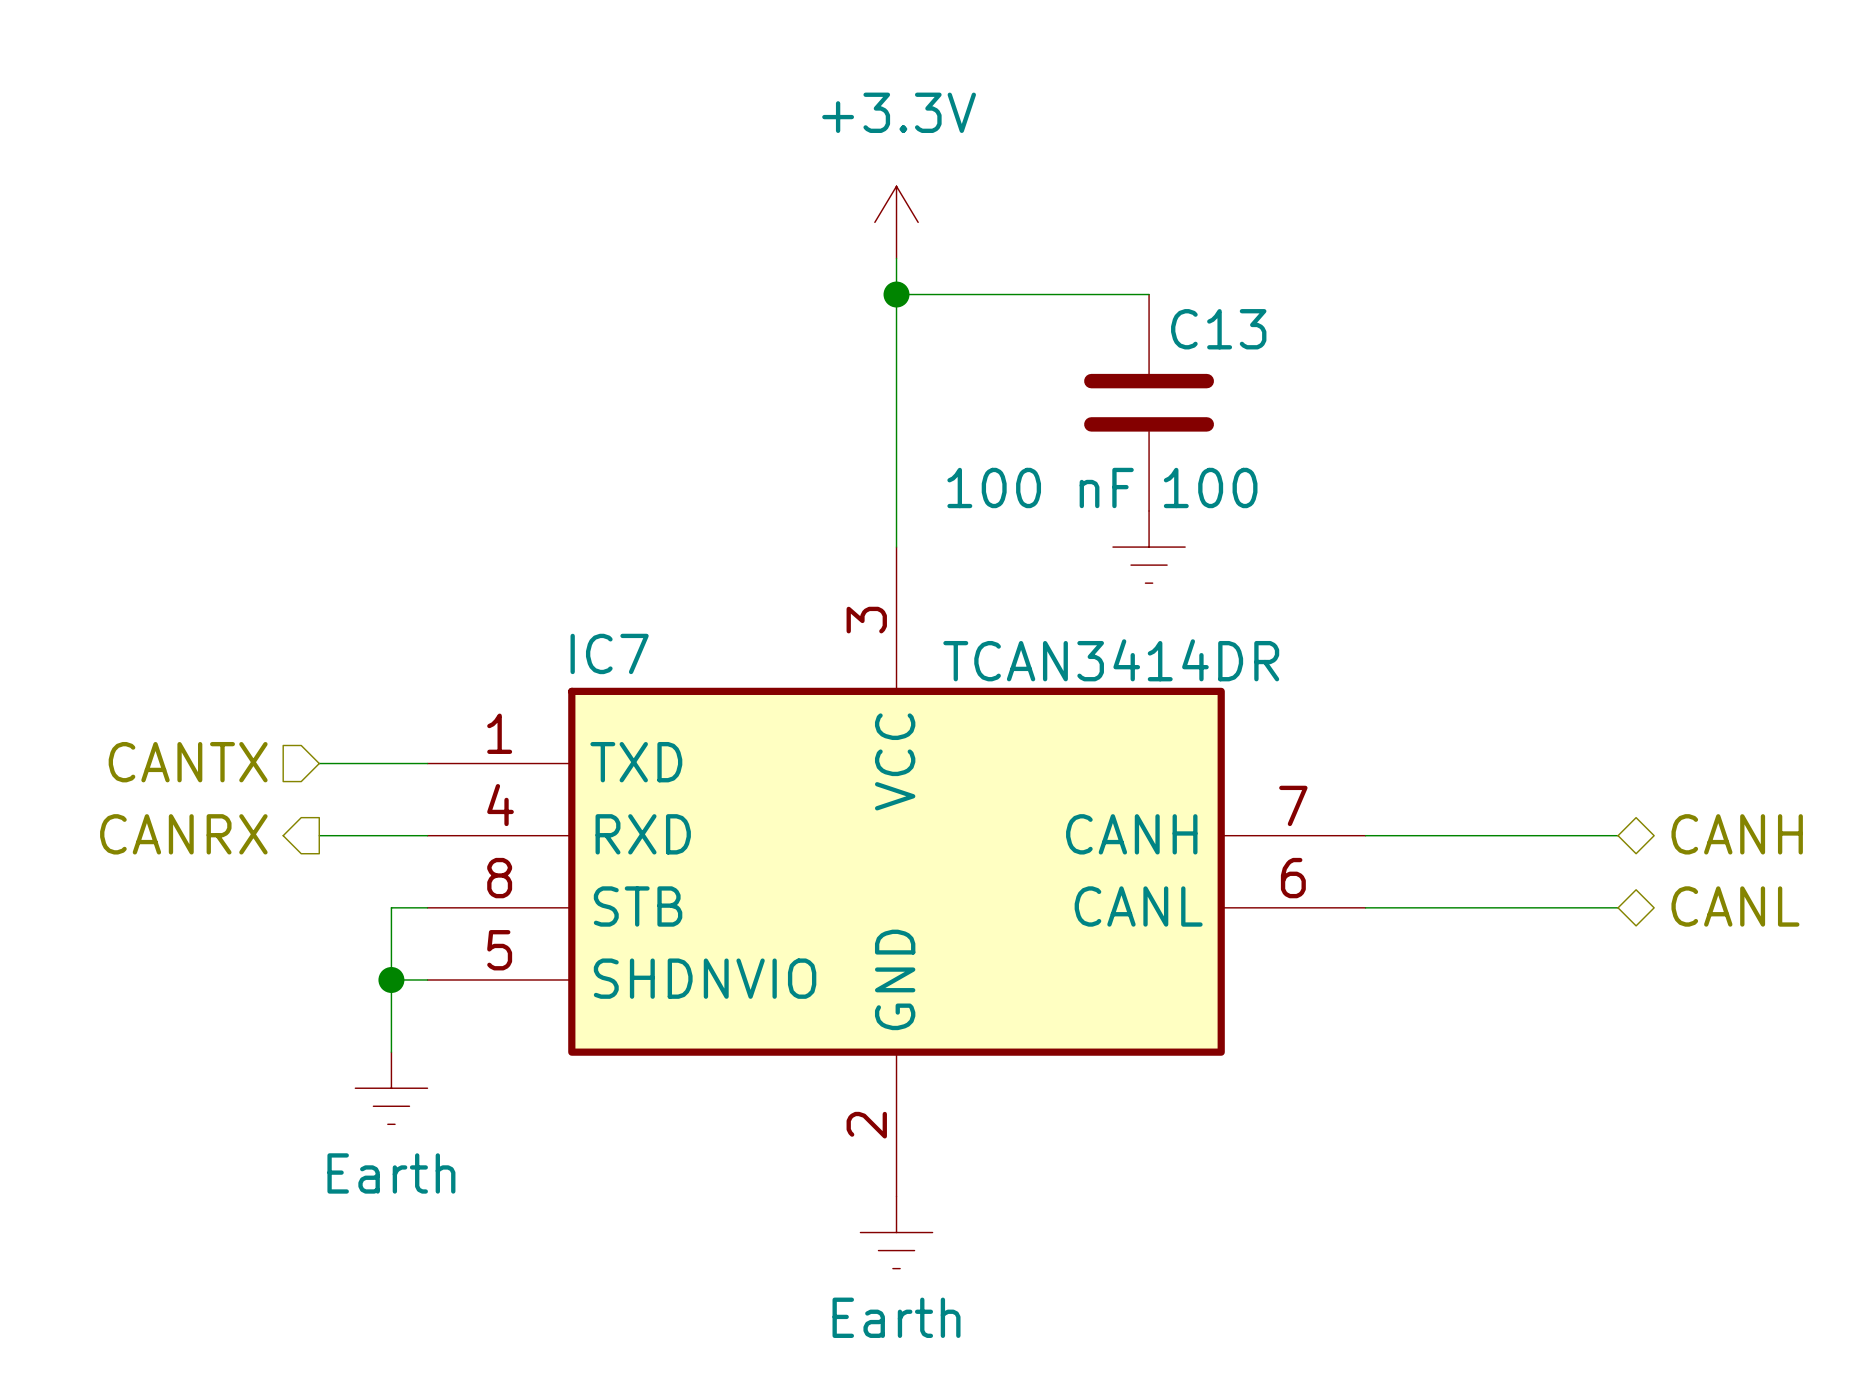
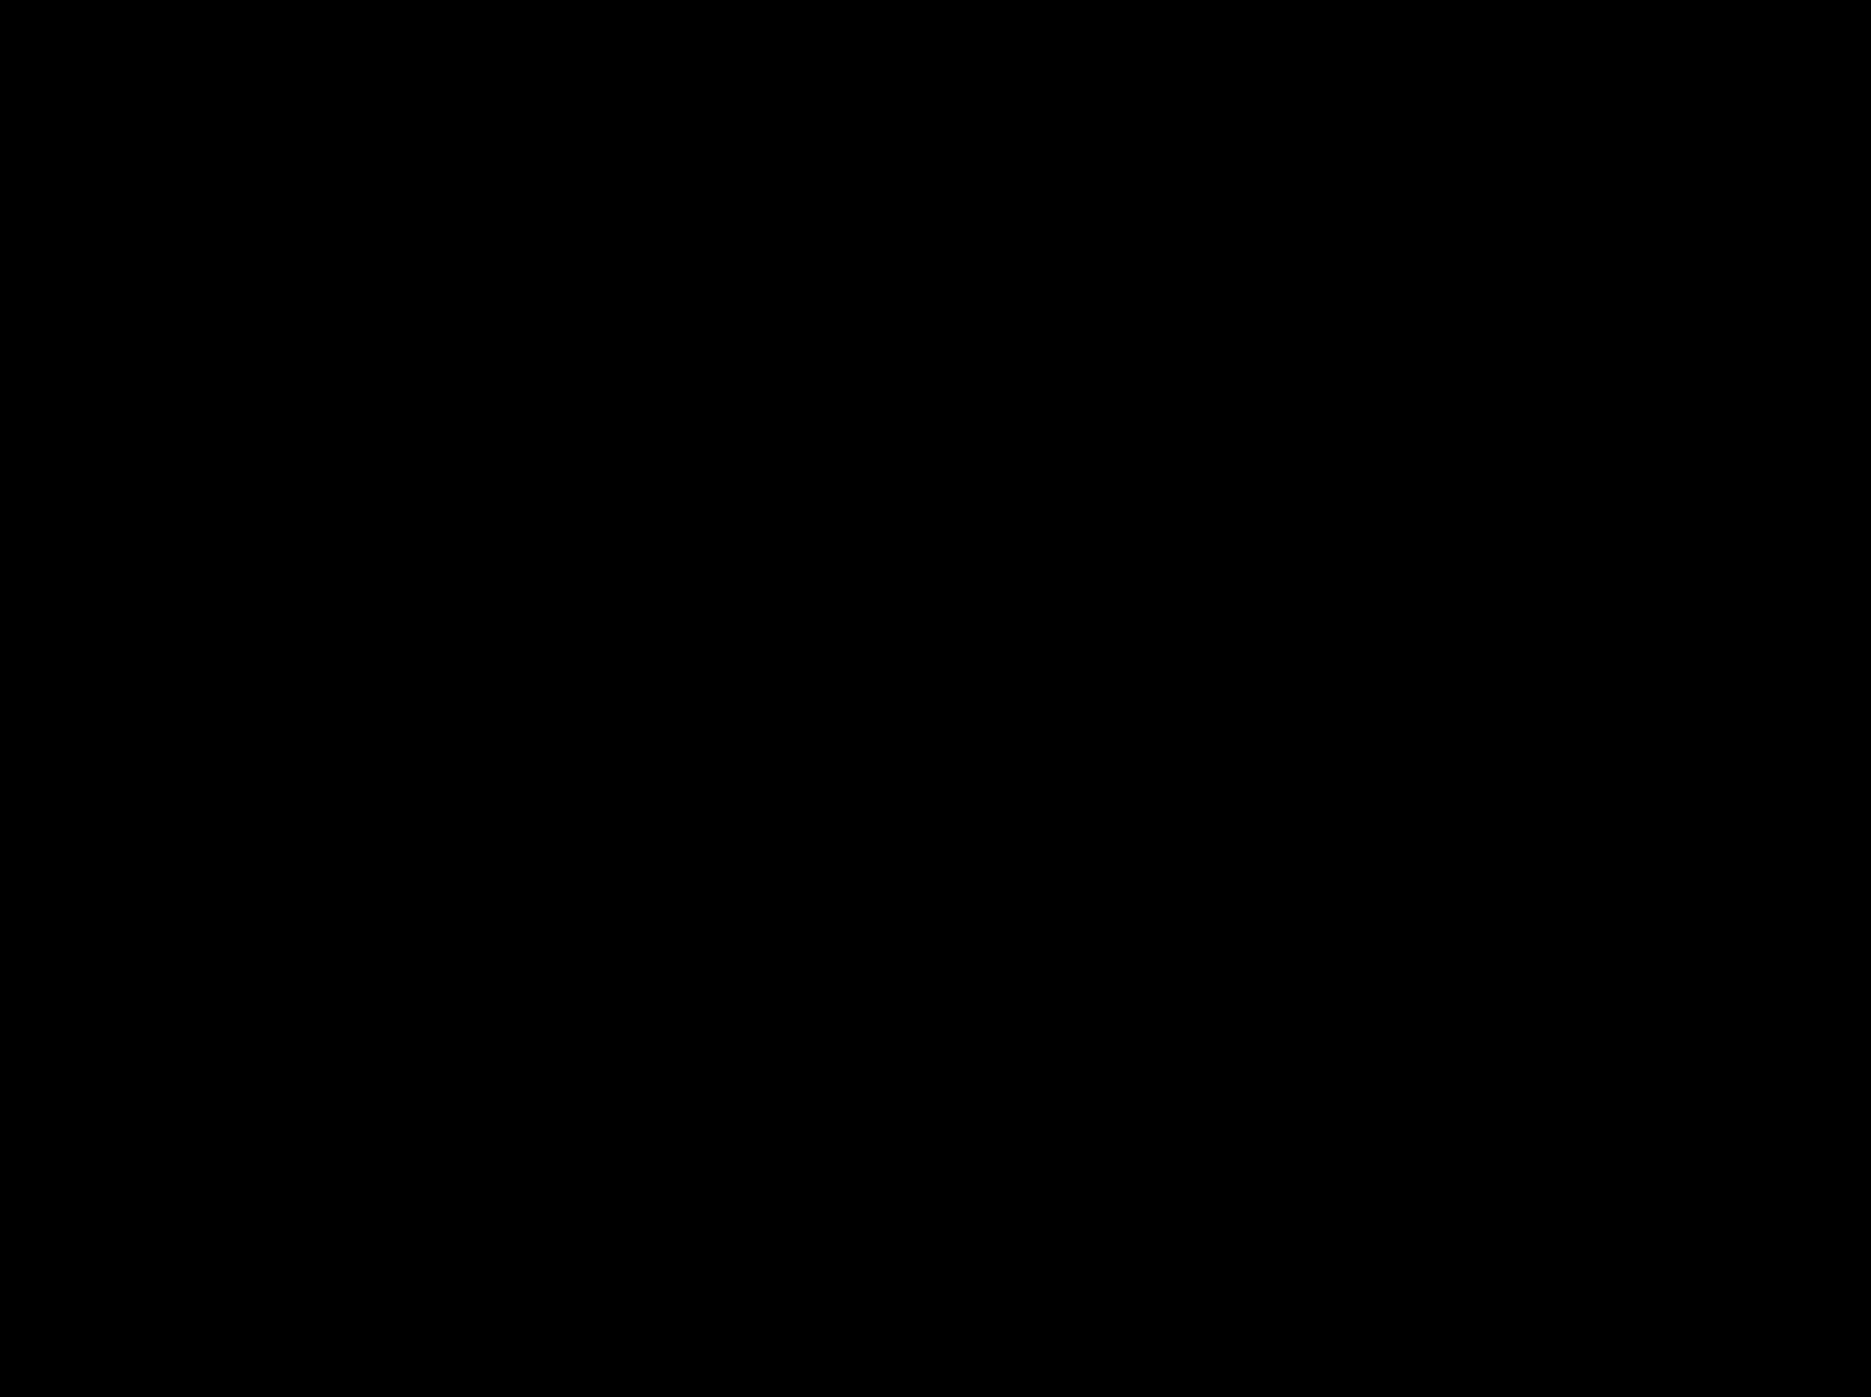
power symbol: +3.3V (896, 222) -> none
wire: (896, 258) (896, 547) -> none
wire: (896, 294) (1149, 294) -> none
junction: (896, 294) -> none
C13: (1149, 402) -> none
power symbol: (1149, 547) -> none
hierarchical label: CANTX (188, 762) -> none
wire: (319, 763) (427, 763) -> none
hierarchical label: CANRX (183, 834) -> none
hierarchical label: CANH (1737, 834) -> none
wire: (319, 835) (427, 835) -> none
wire: (1365, 835) (1618, 835) -> none
IC7: TCAN3414DR (896, 871) -> none
hierarchical label: CANL (1735, 906) -> none
wire: (427, 907) (391, 907) (391, 1052) -> none
wire: (1365, 907) (1618, 907) -> none
wire: (391, 979) (427, 979) -> none
junction: (391, 979) -> none
power symbol: Earth (391, 1088) -> none
power symbol: Earth (896, 1232) -> none

